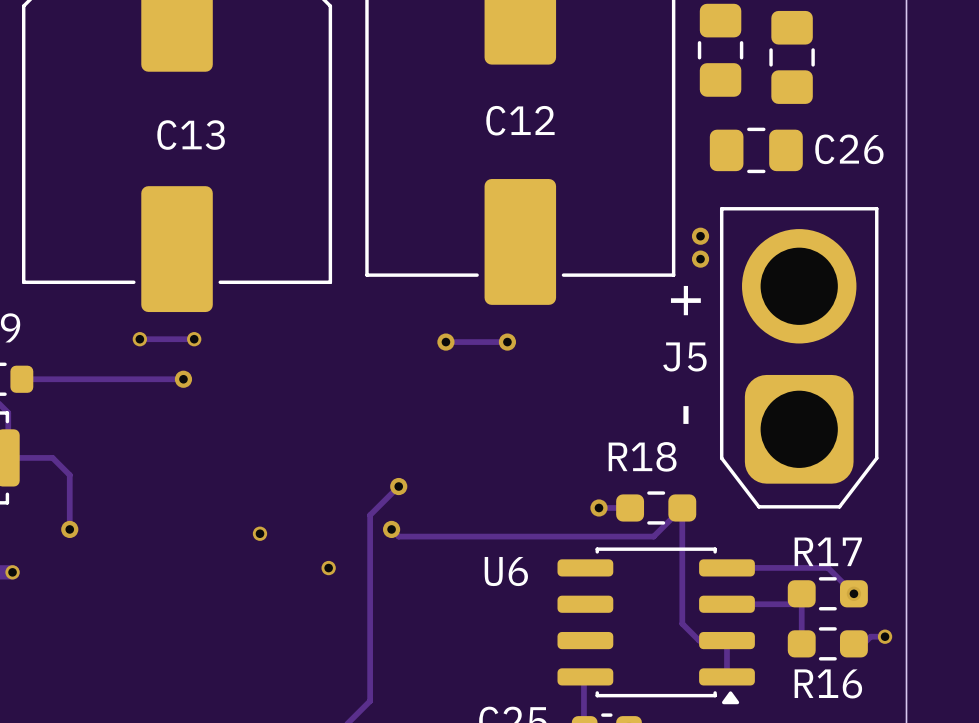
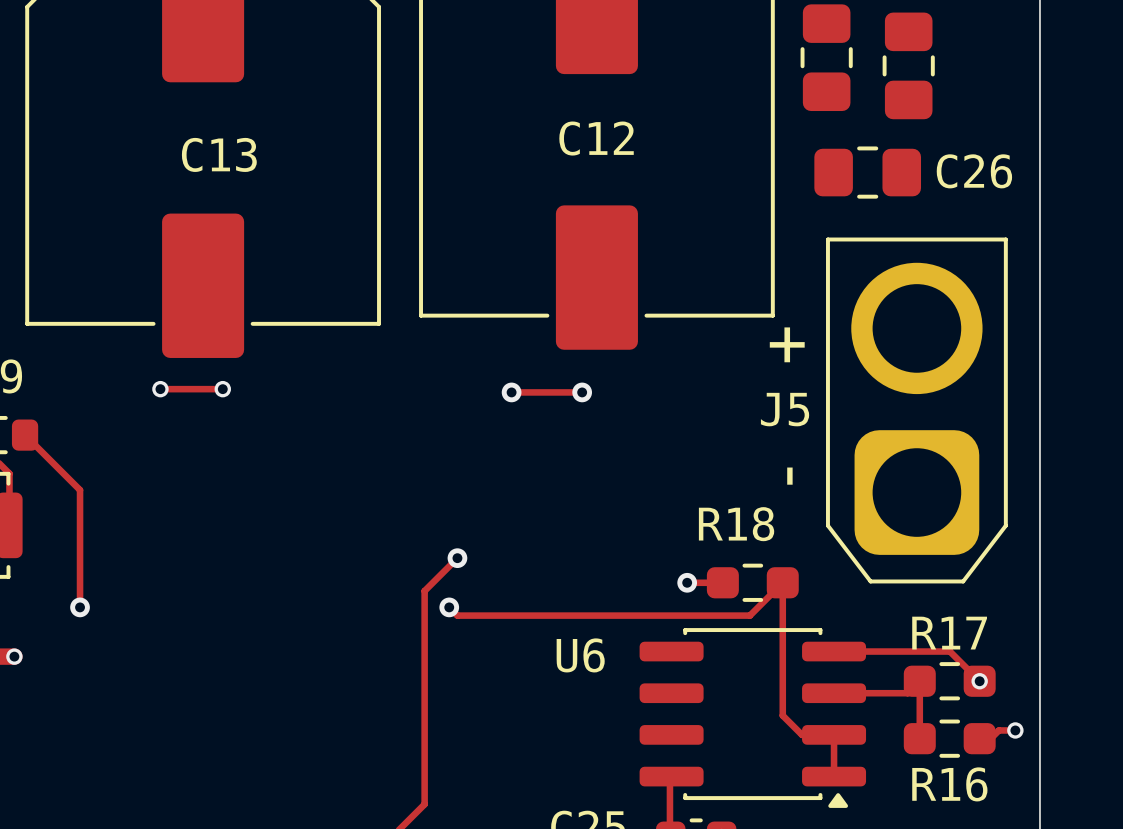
via: (700, 236) -> none
via: (700, 259) -> none
track: (21, 379) (183, 379) -> none
via: (183, 379) -> none
track: (8, 457) (52, 457) (69, 475) -> (25, 435) (80, 490) (80, 545)
via: (259, 533) -> none
via: (328, 568) -> none

